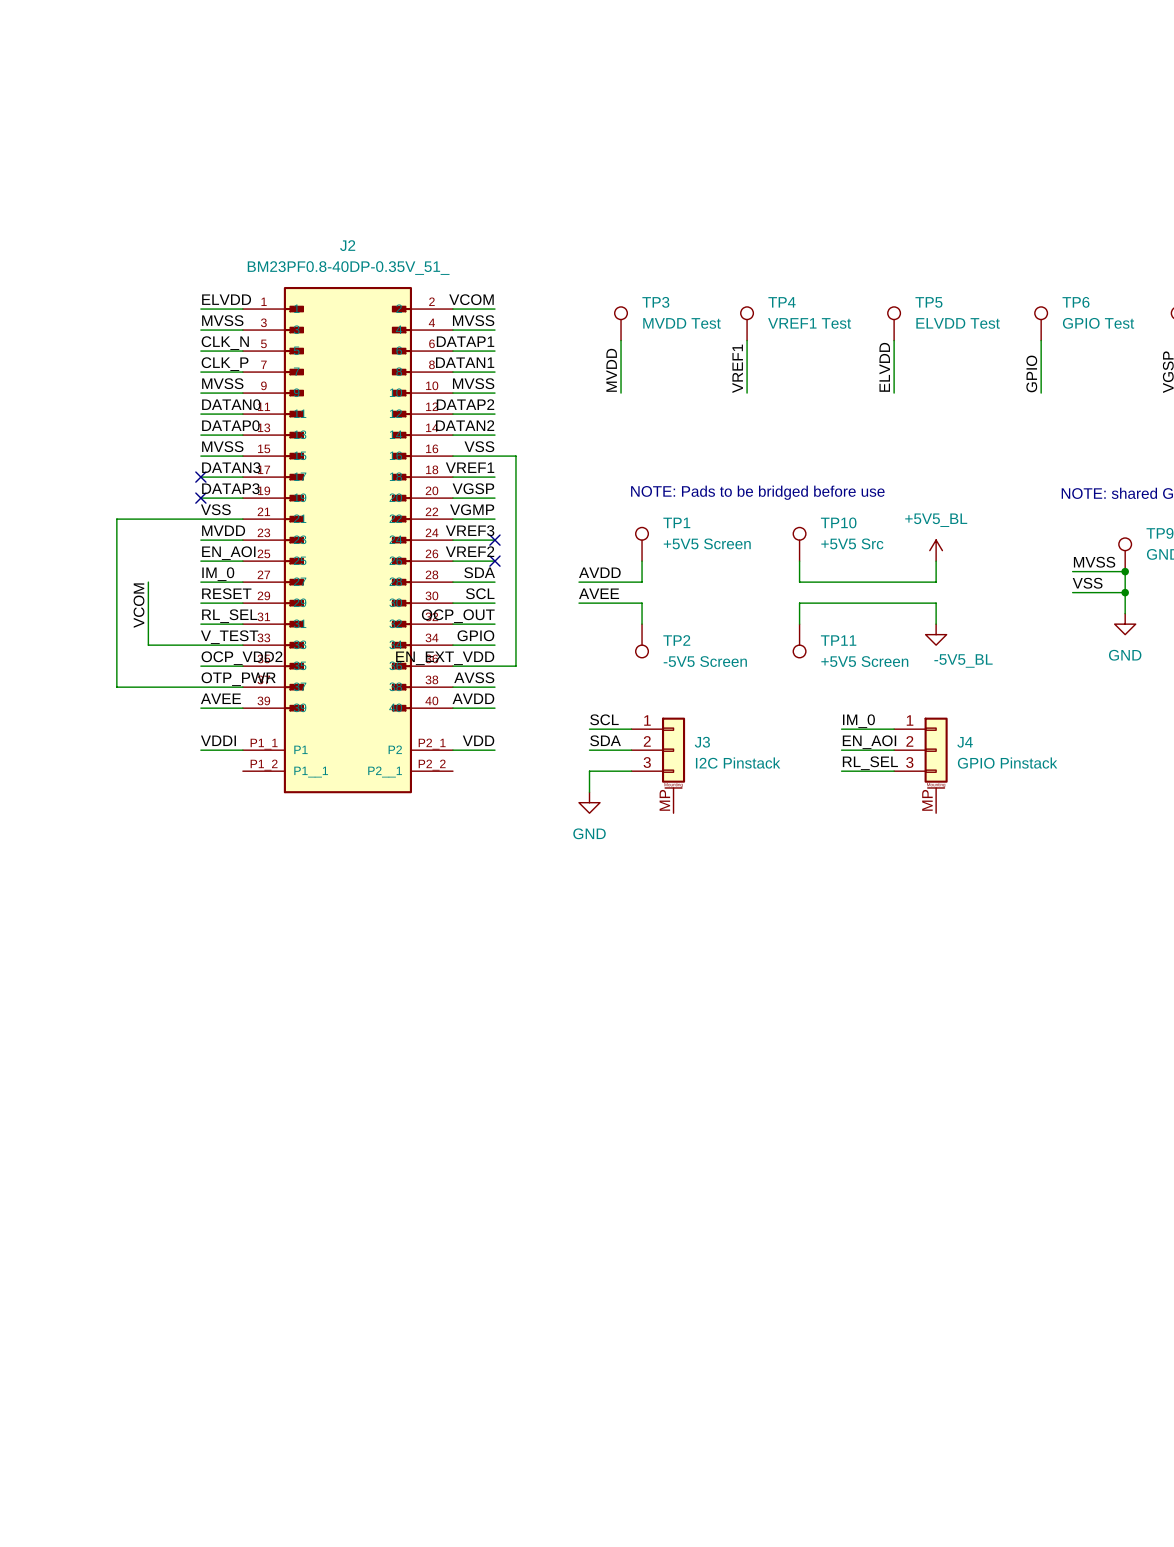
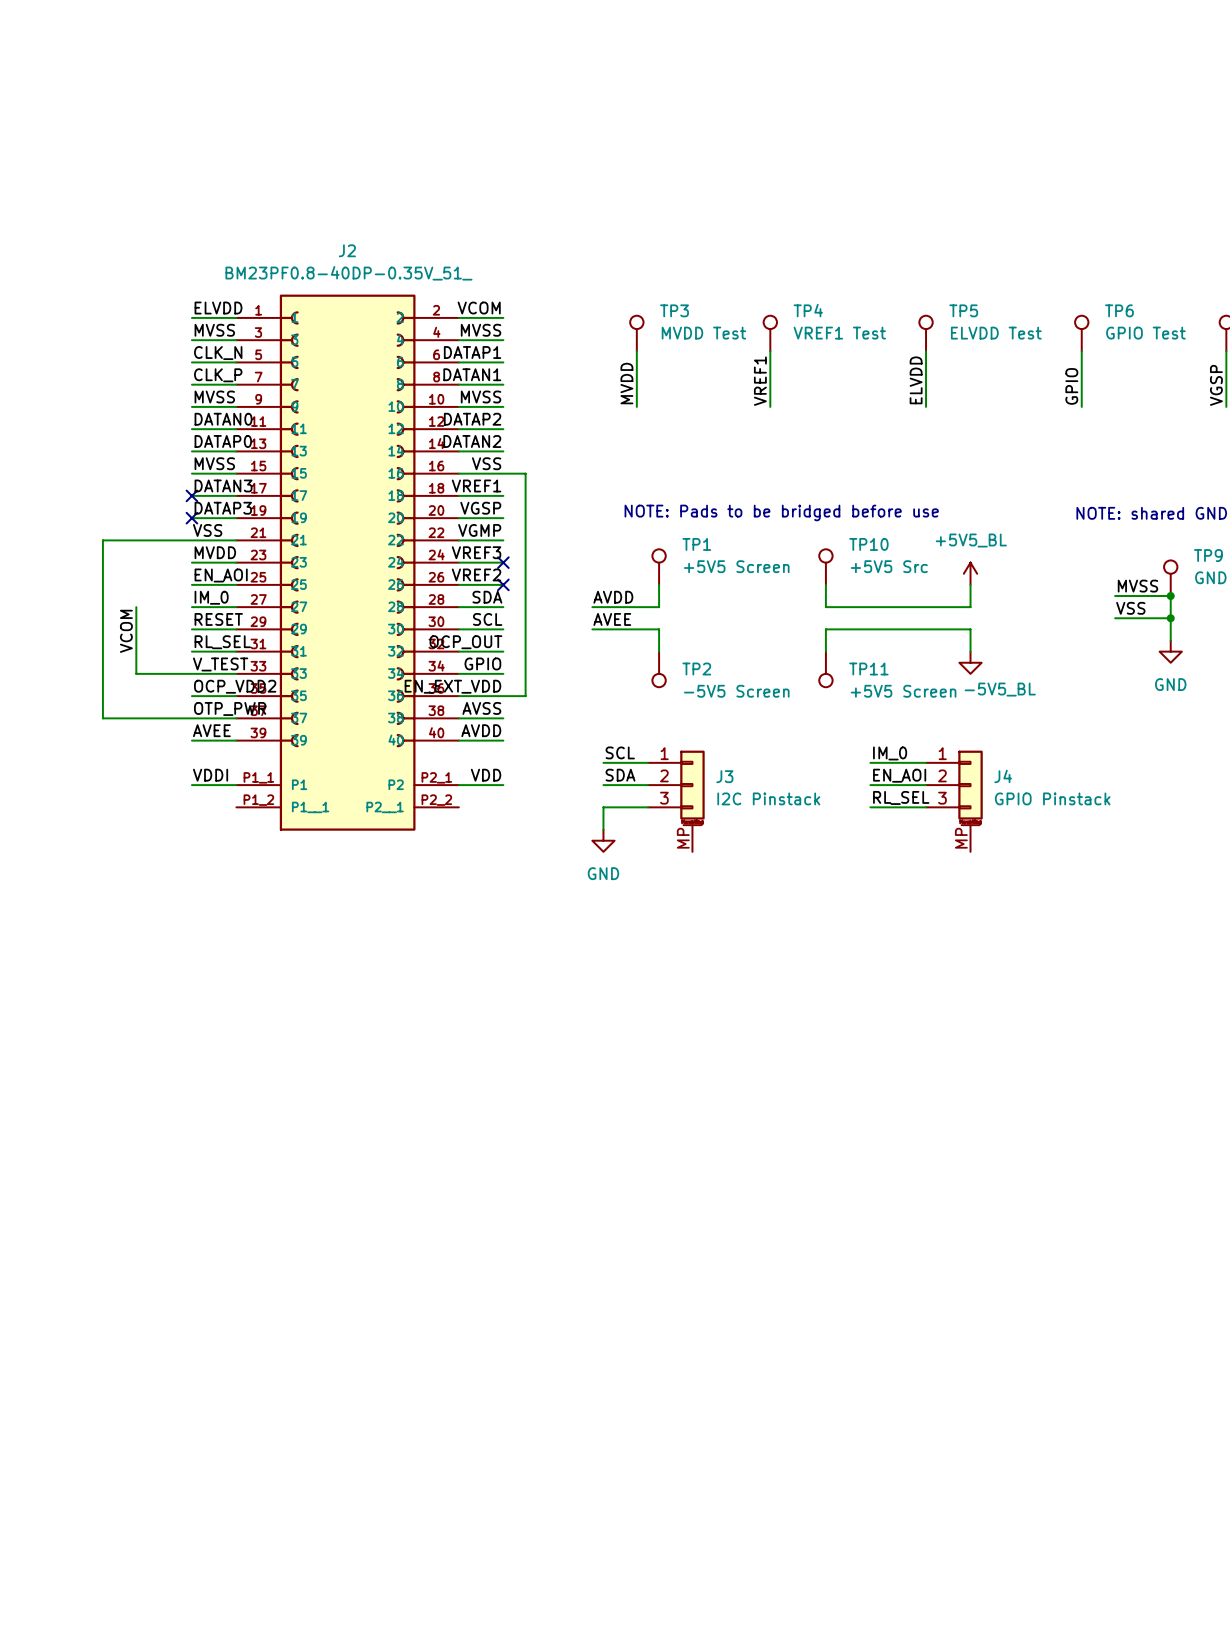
J2 symbol: [242, 286, 453, 794] -> [236, 294, 459, 831]

